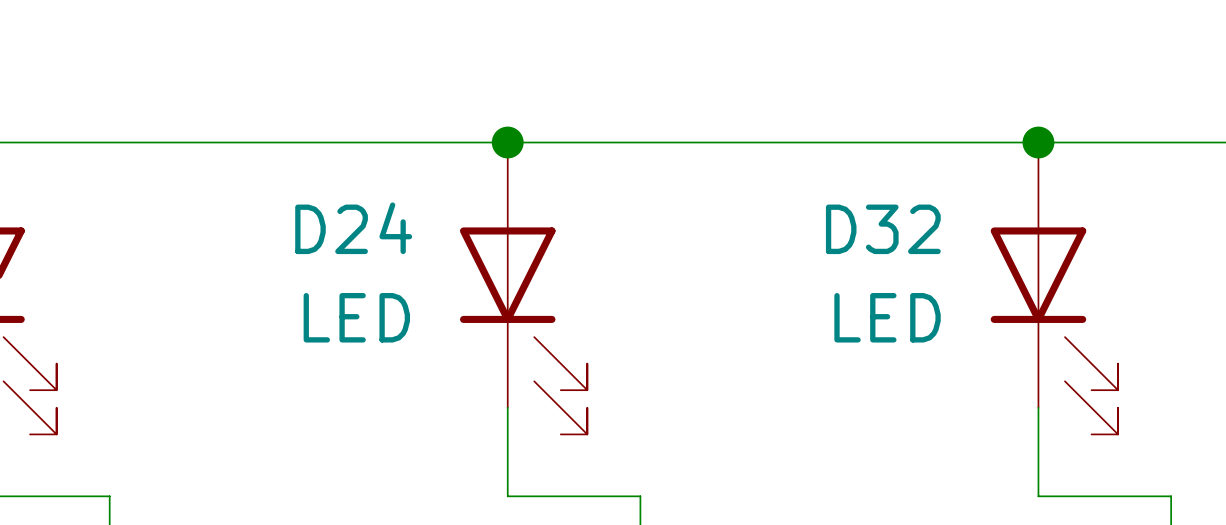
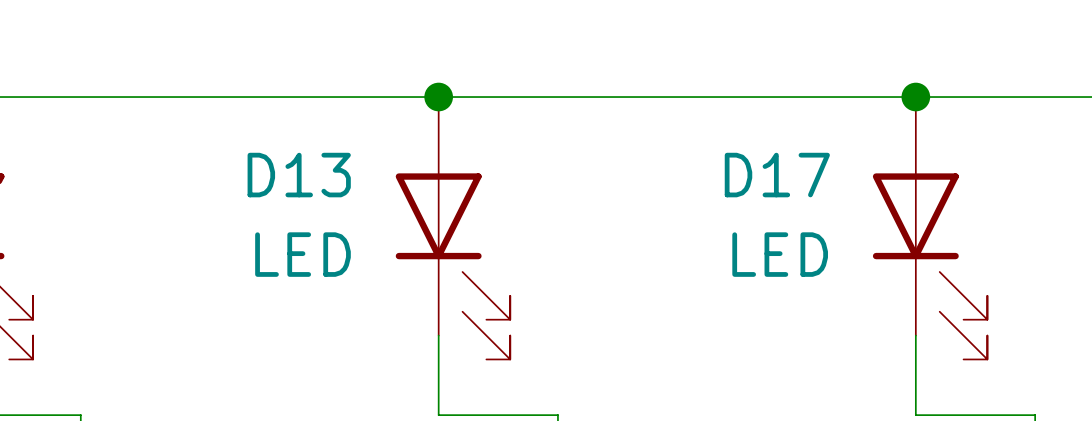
D24 name: D24 (353, 228) -> D13 (299, 175)
D32 name: D32 (883, 229) -> D17 (777, 175)

